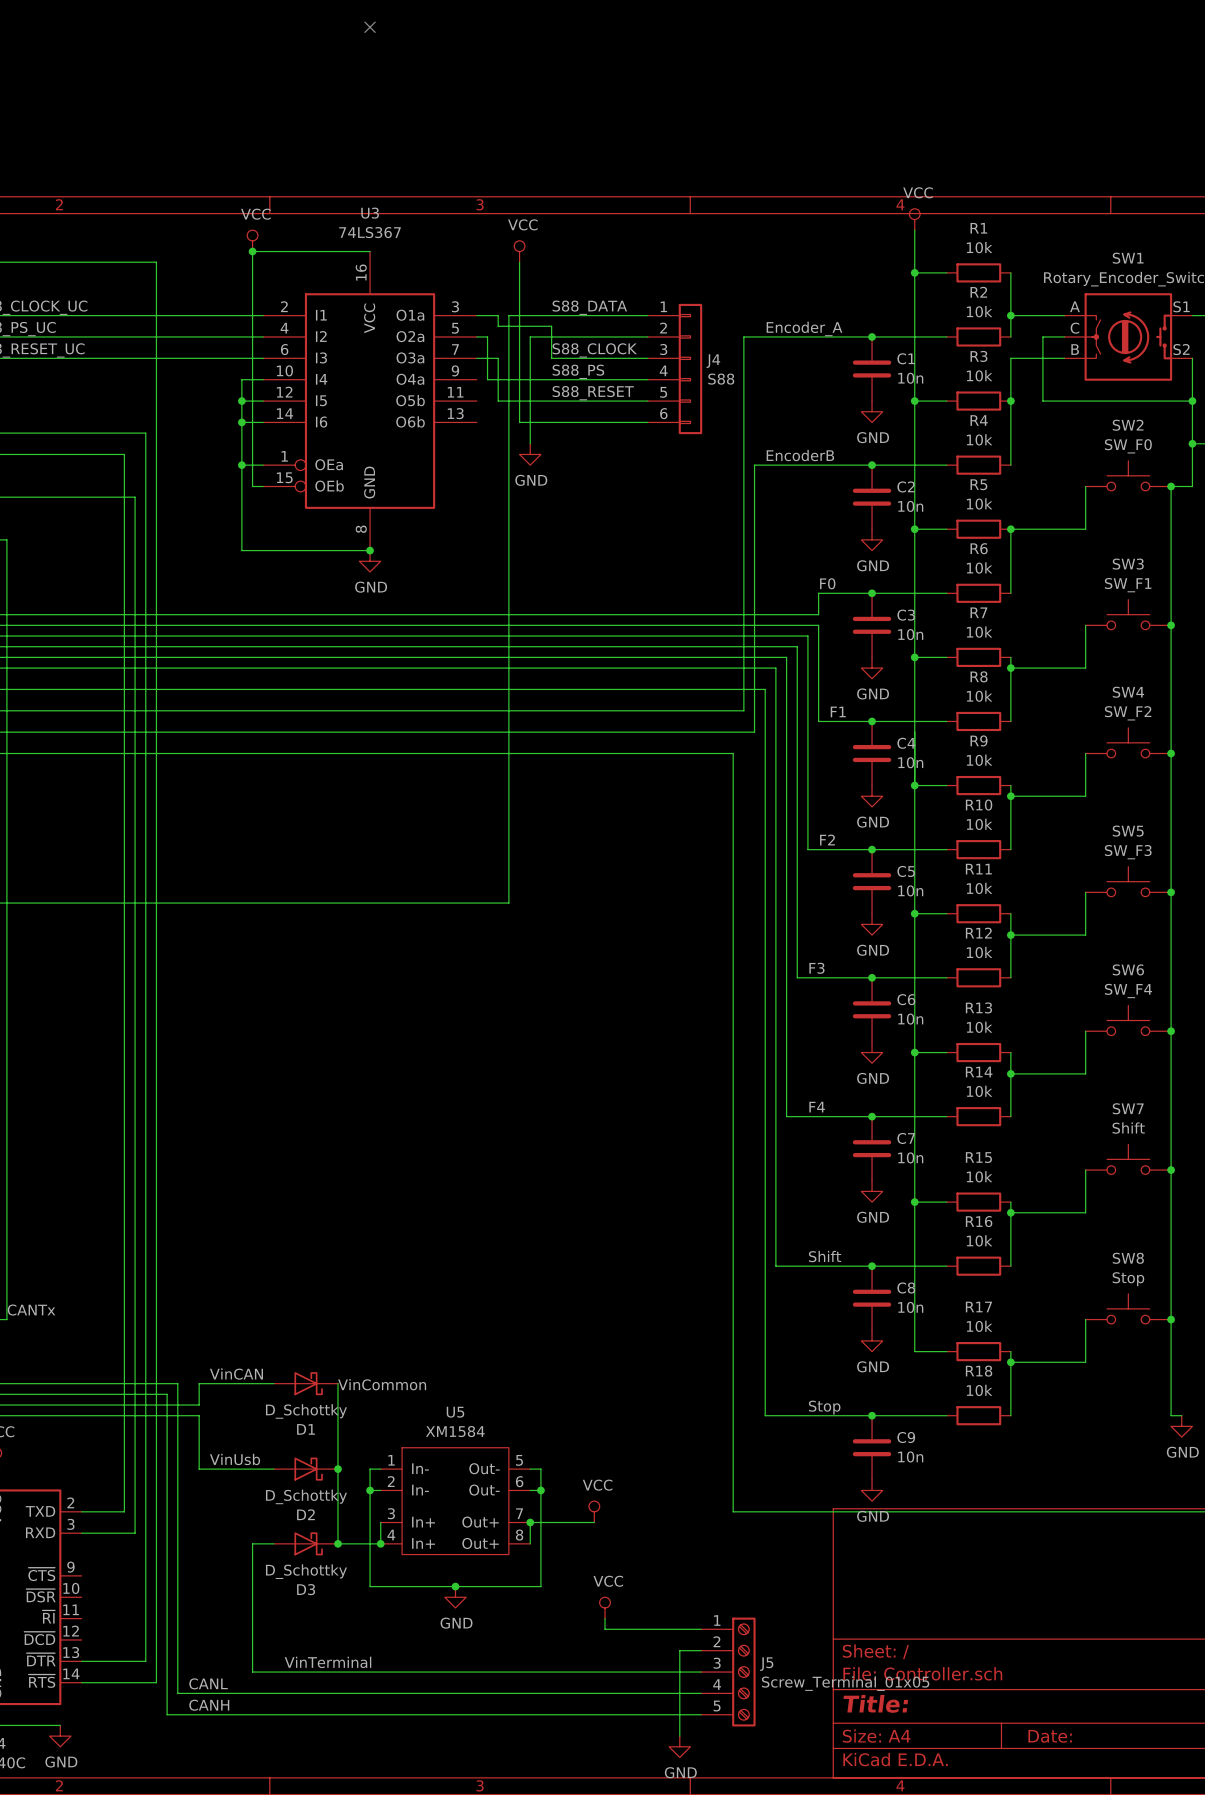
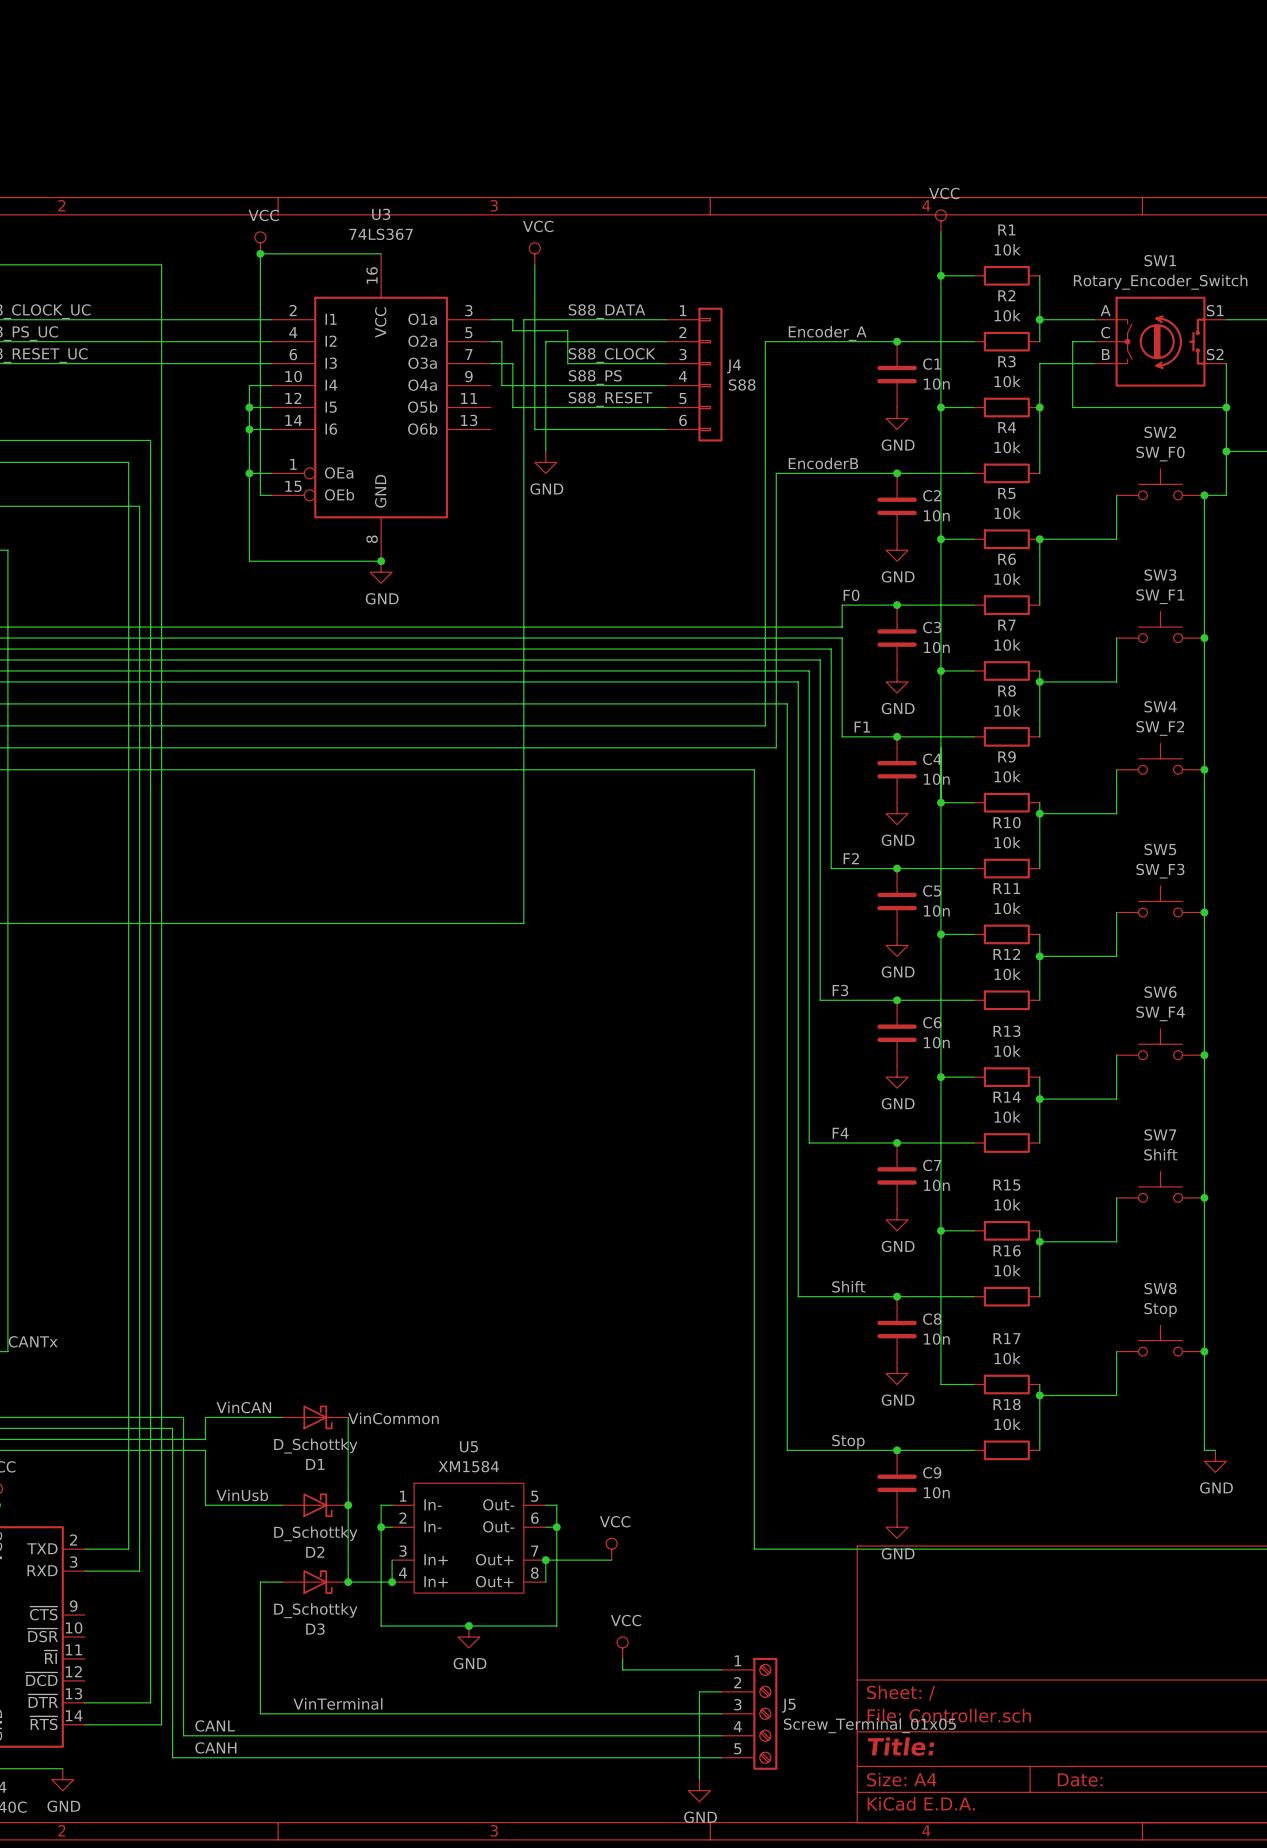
no-connect mark: (370, 27) -> none

